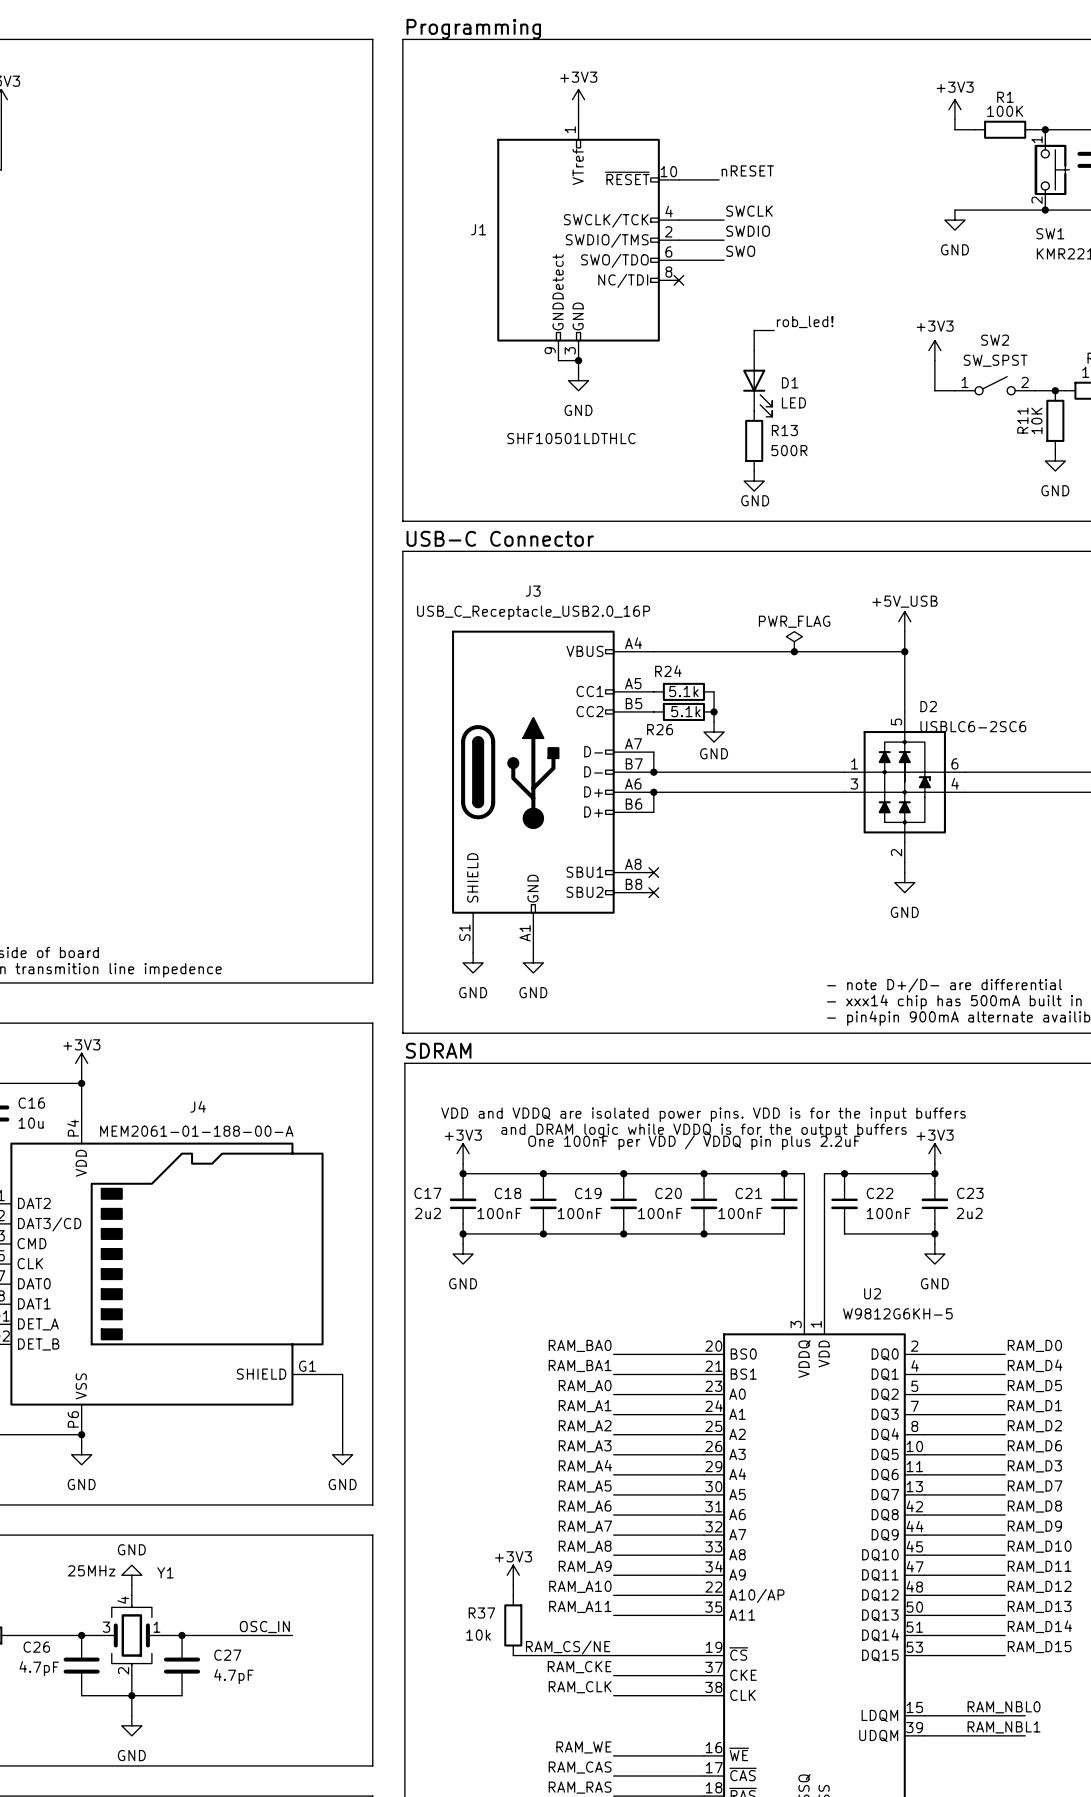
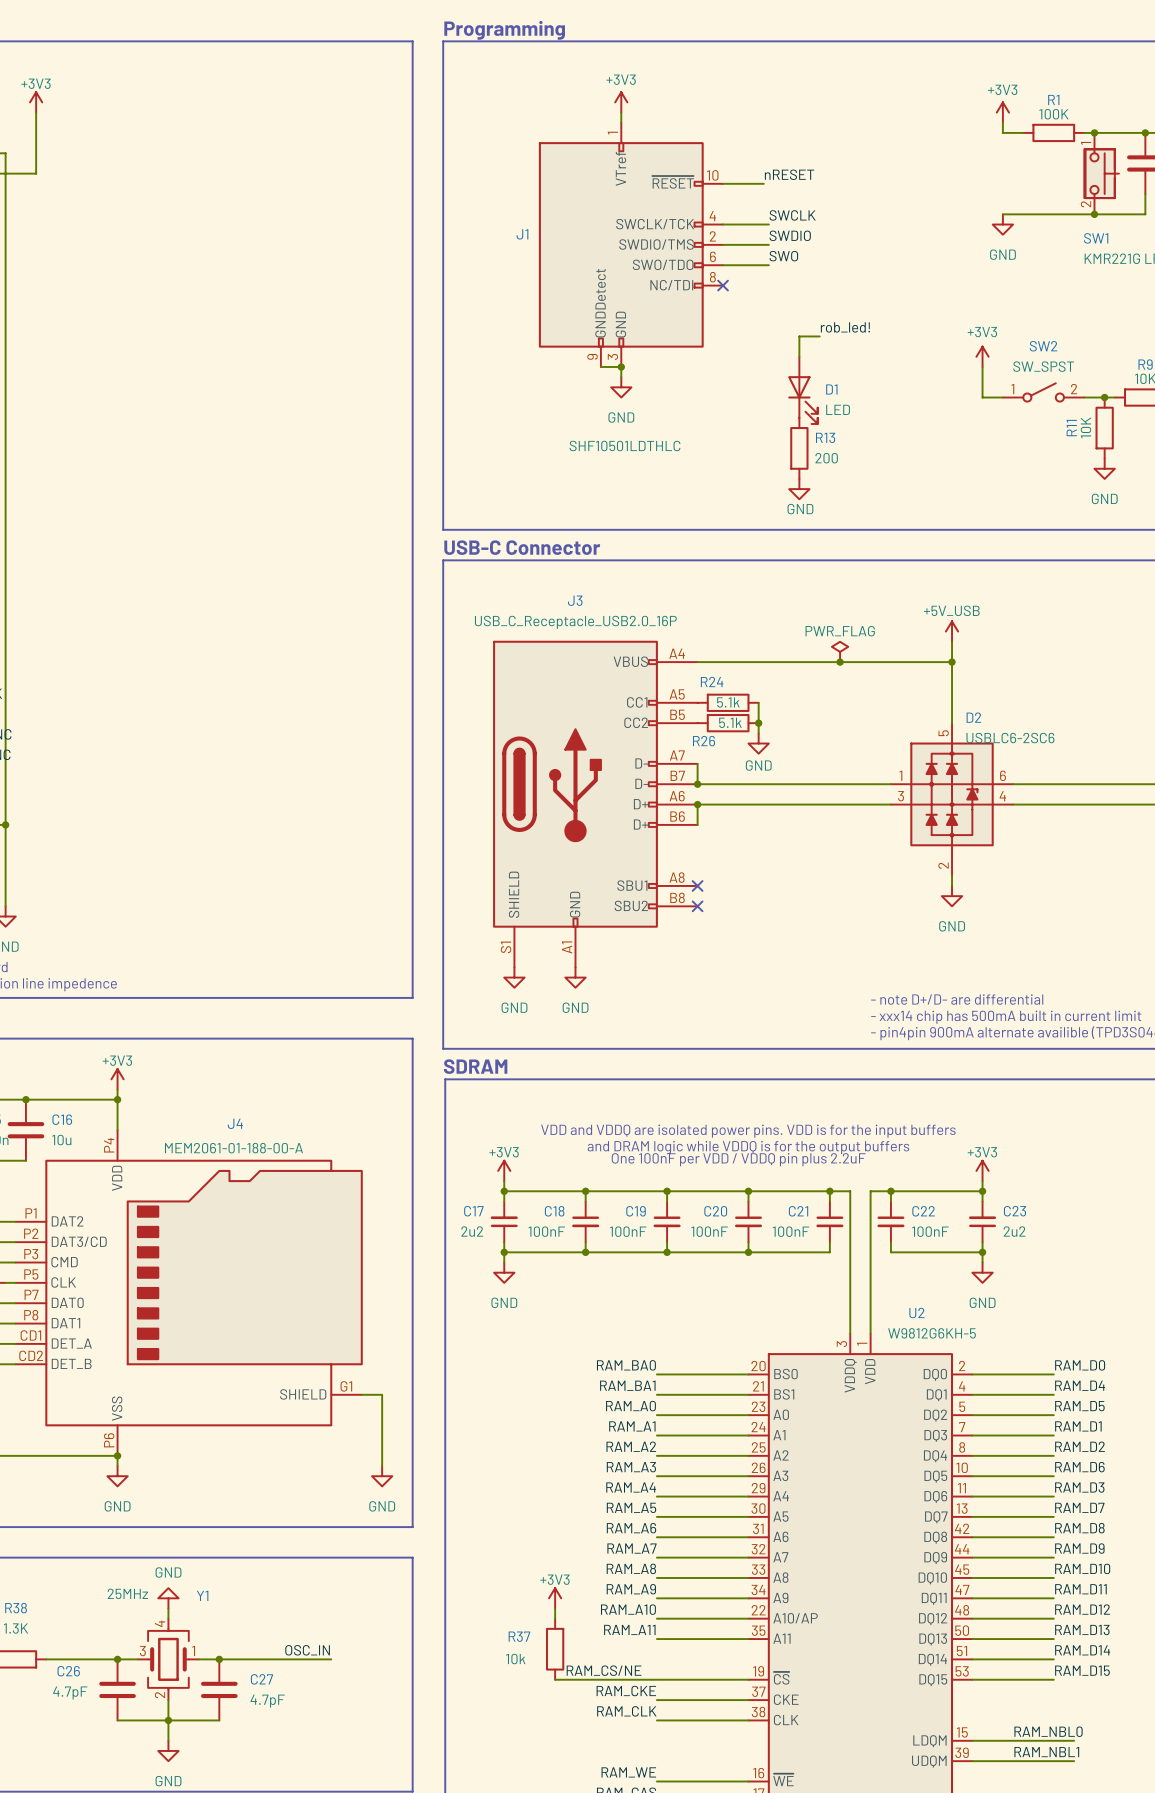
R13 value: 500R (789, 450) -> 200 (826, 458)

